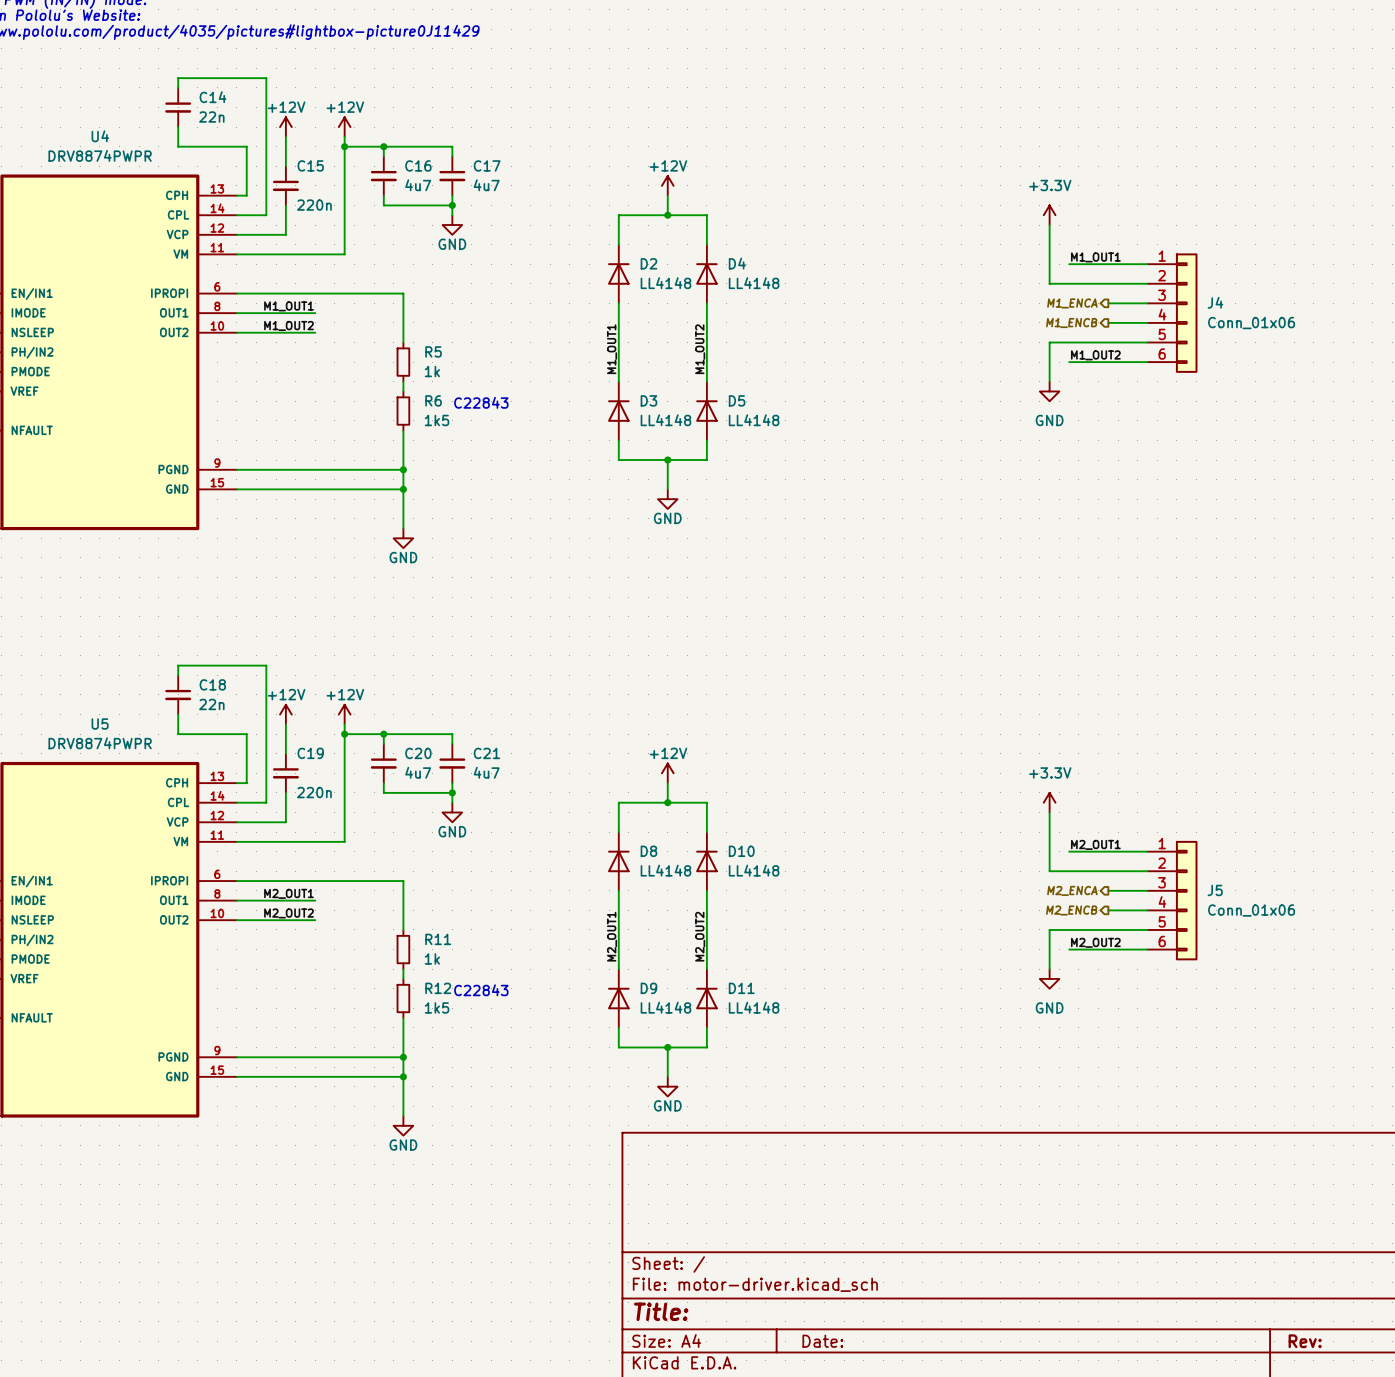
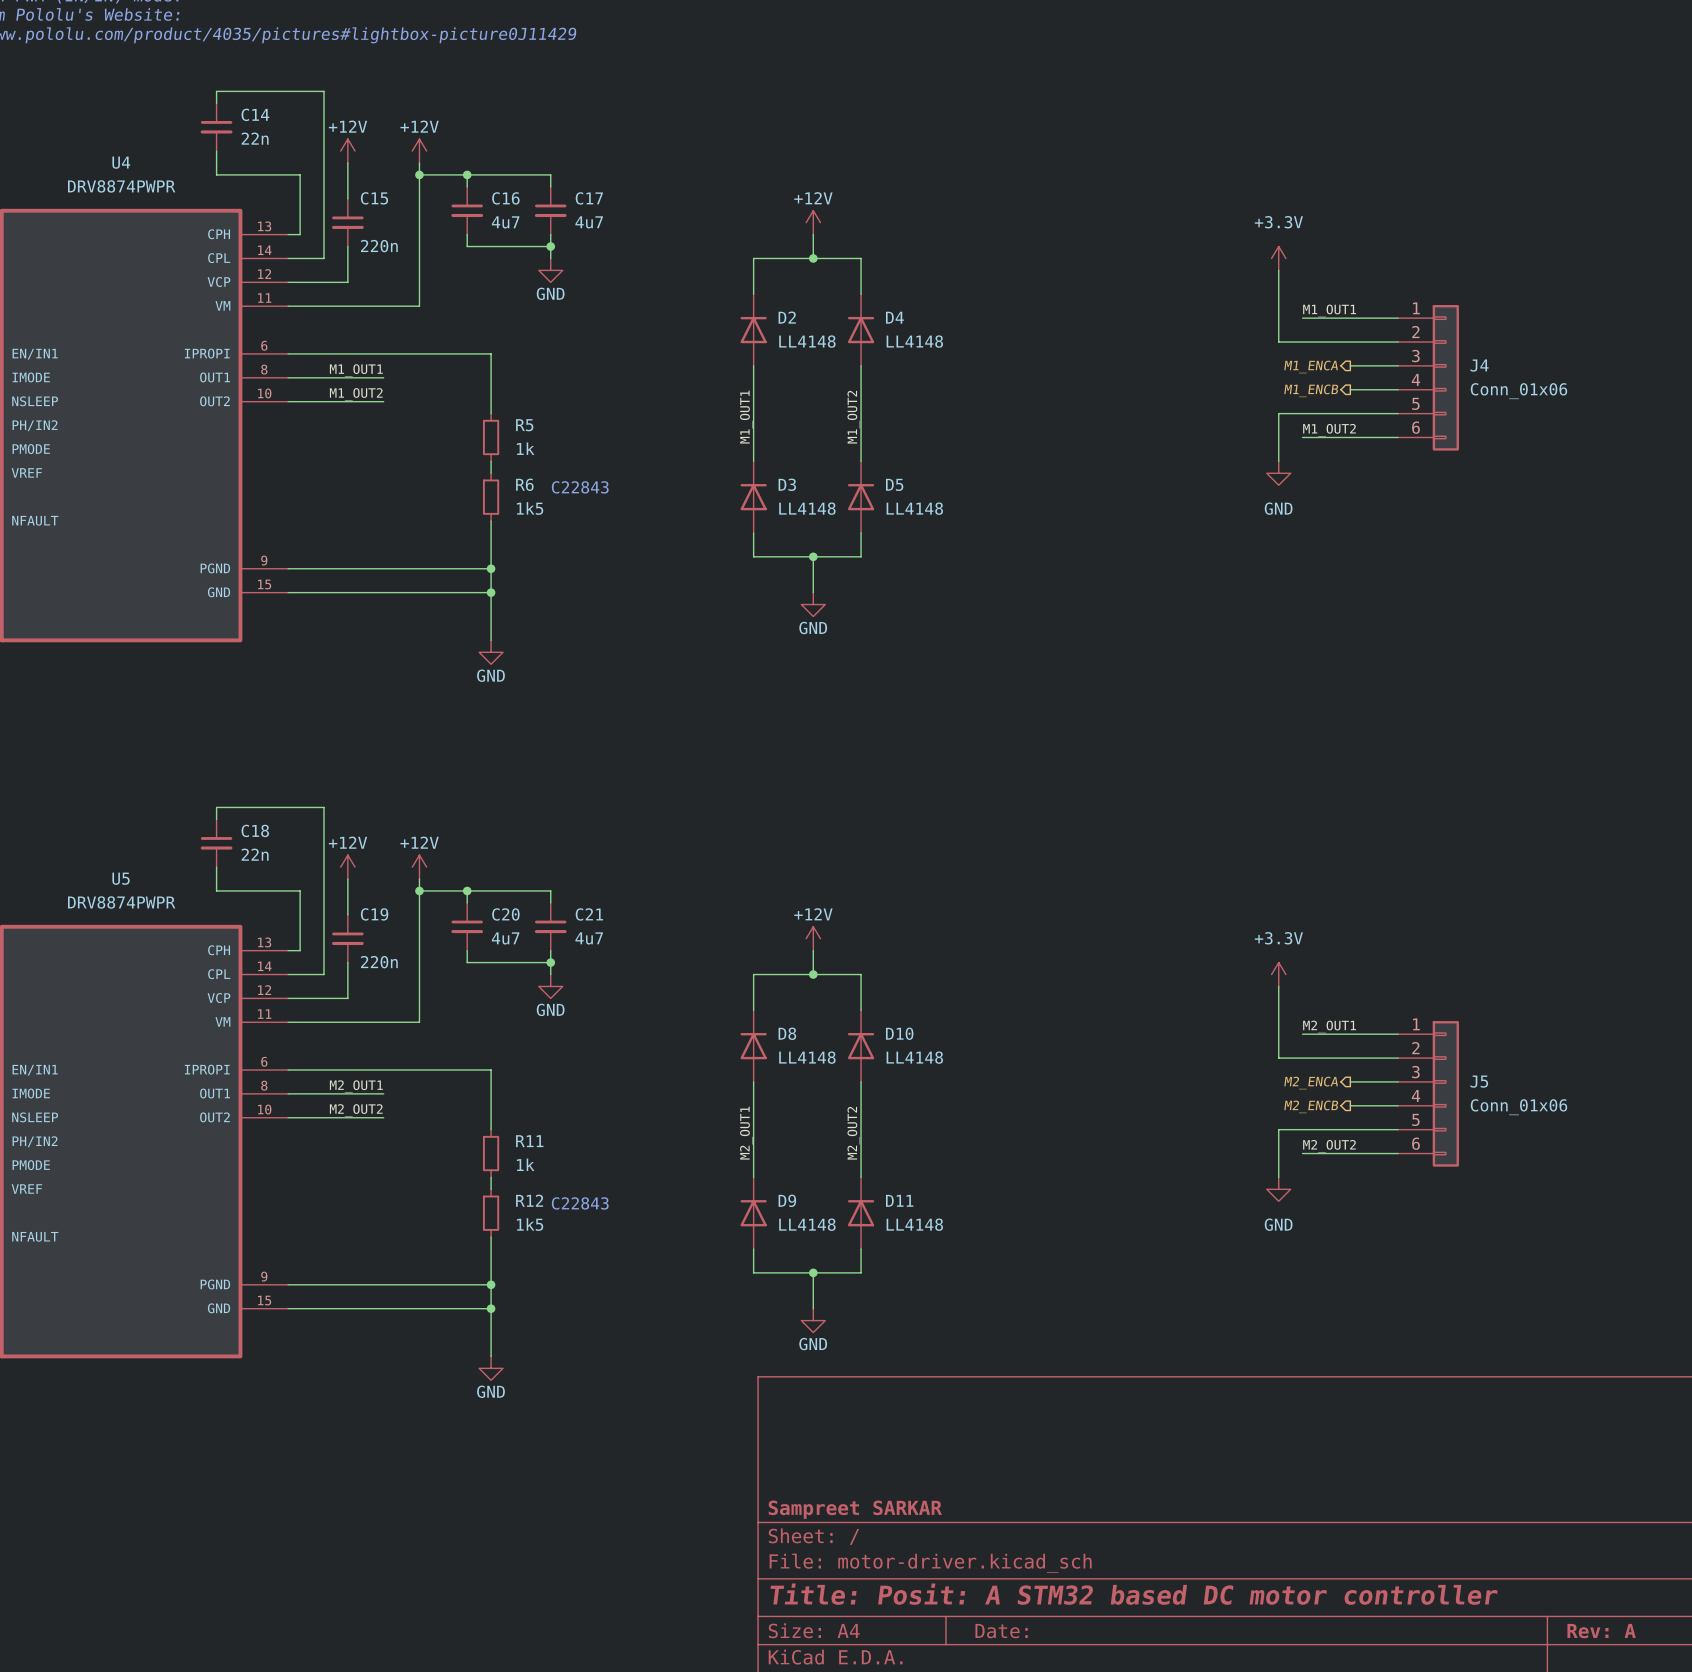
title block: none -> Sampreet SARKAR (855, 1509)
title block: Title: (661, 1311) -> Title: Posit: A STM32 based DC motor controller (1134, 1594)
title block: Rev: (1305, 1341) -> Rev: A (1601, 1631)

